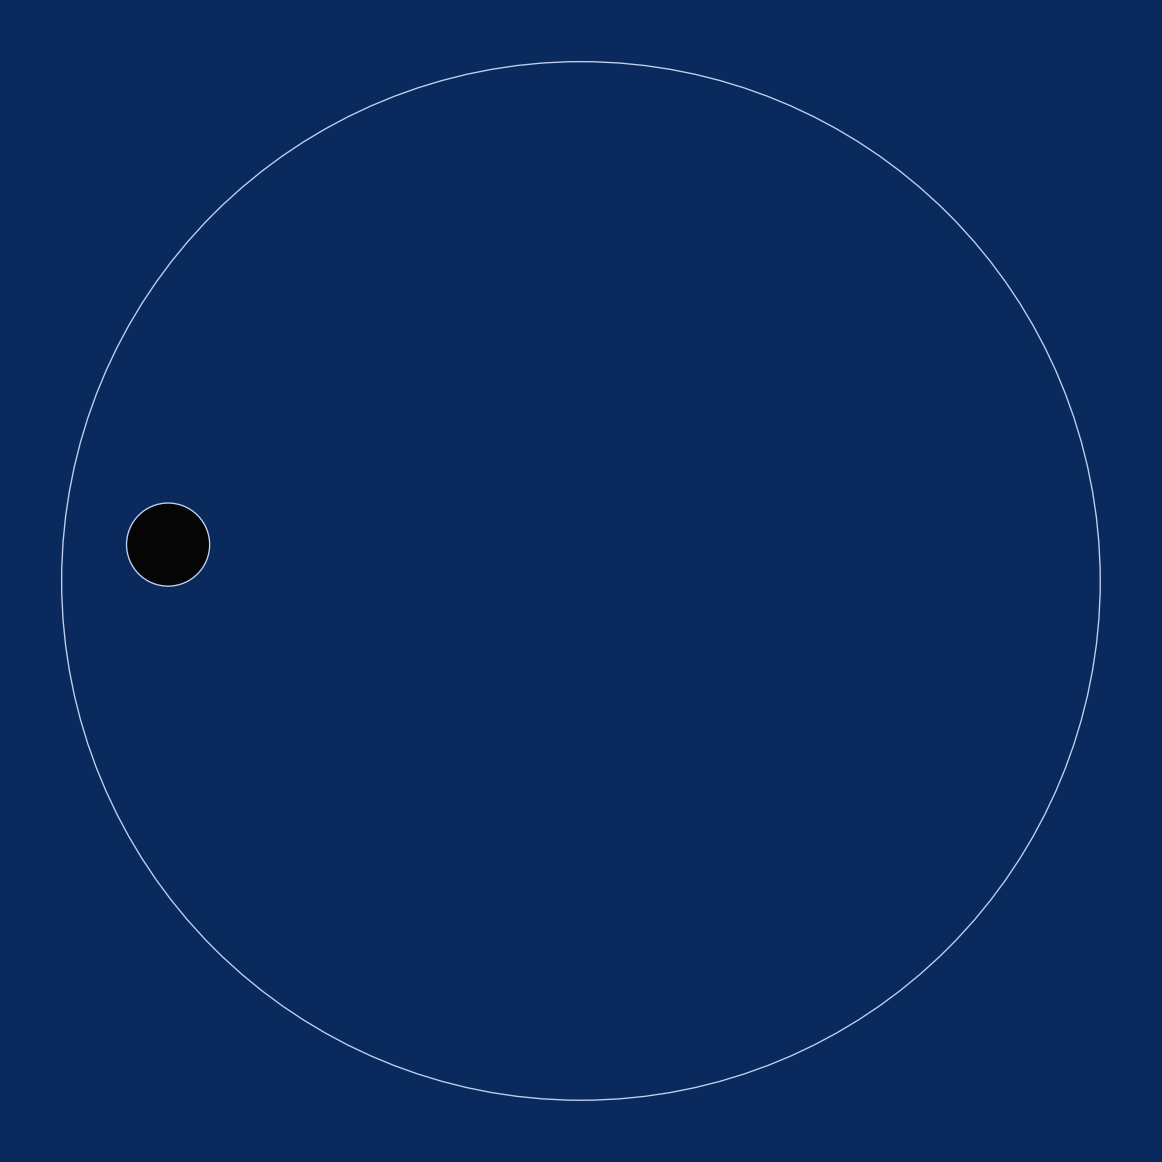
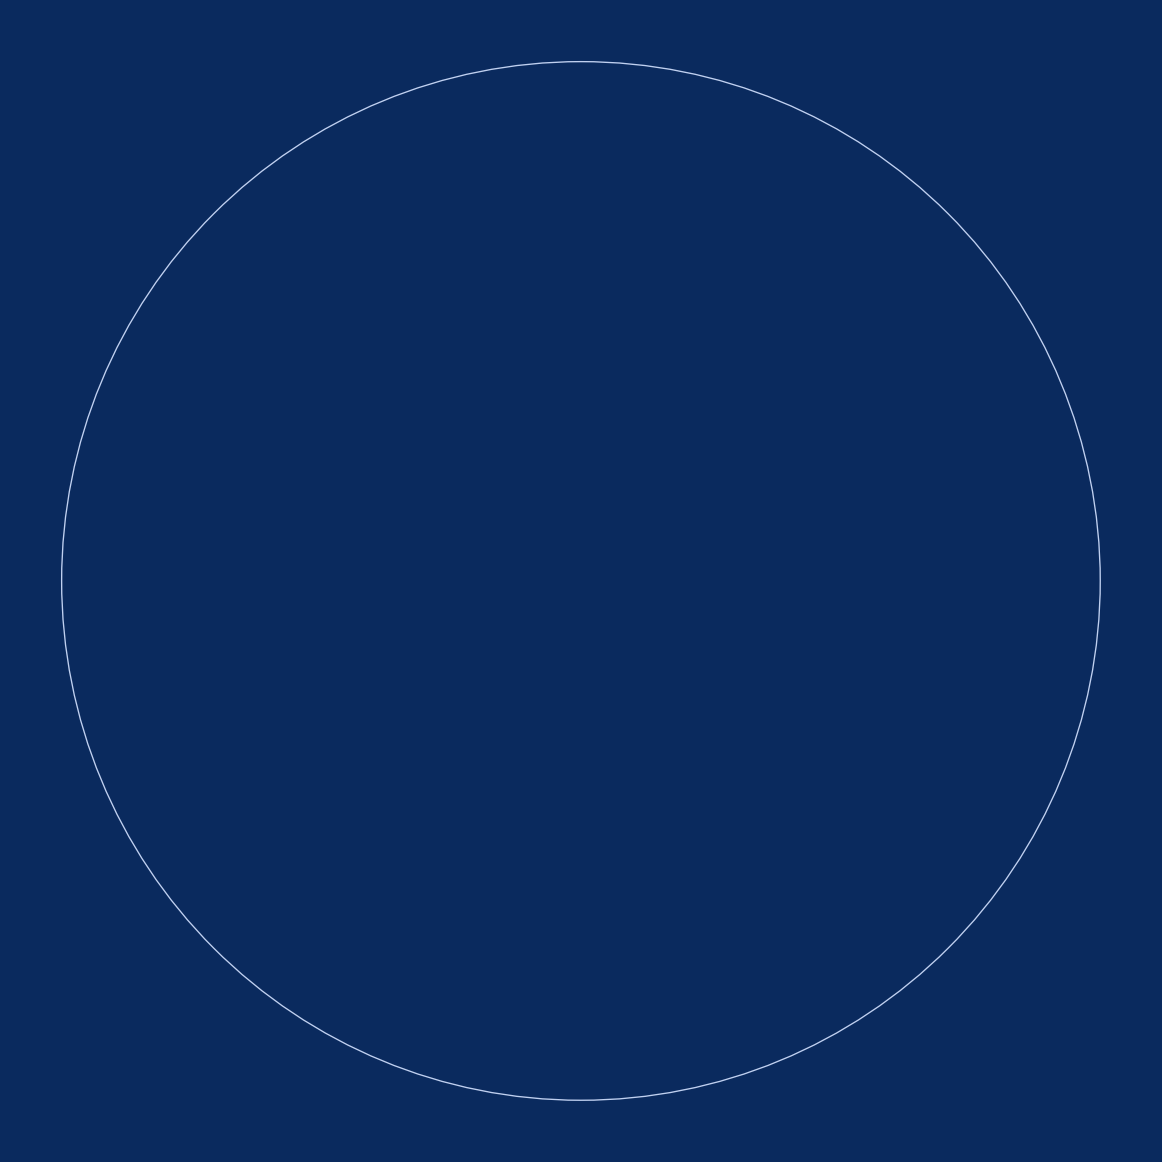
part: (168, 544) -> none

